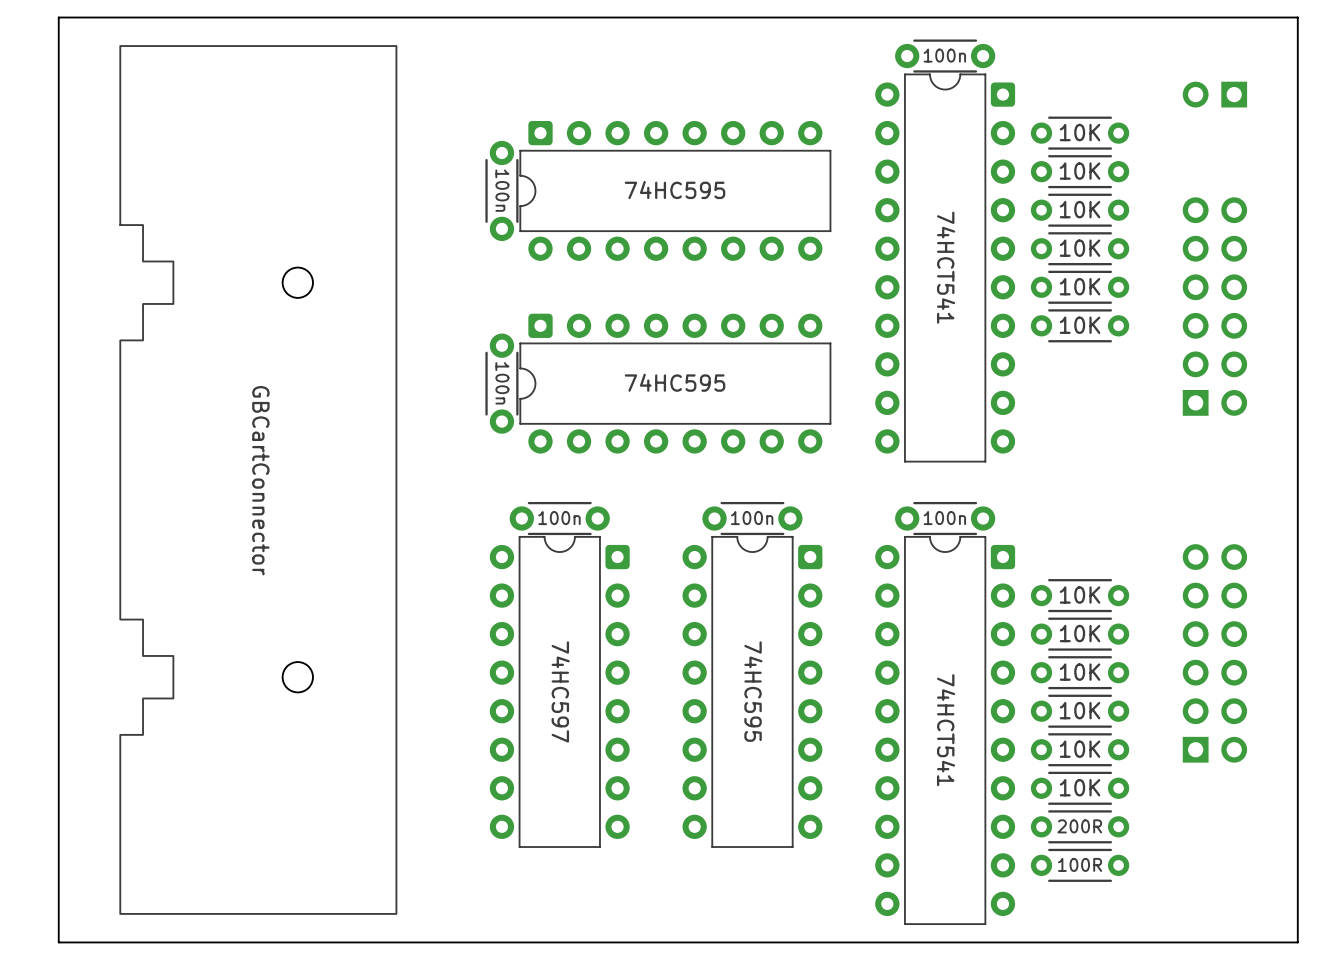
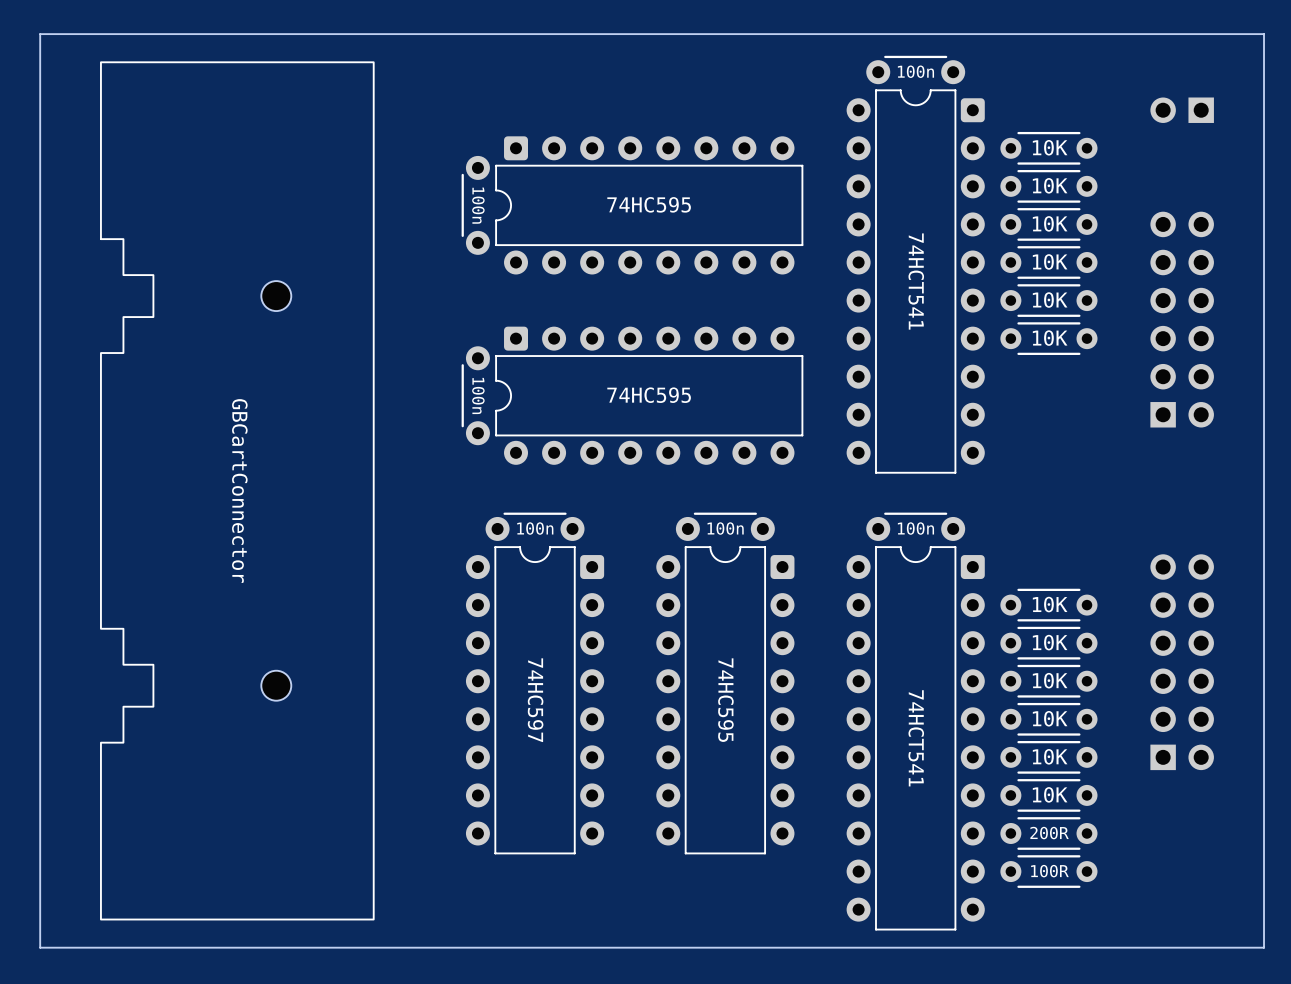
line: (975, 71) (914, 71) -> none
line: (517, 160) (517, 221) -> none
line: (517, 352) (517, 414) -> none
line: (590, 533) (528, 533) -> none
line: (783, 533) (721, 533) -> none
line: (975, 533) (914, 533) -> none

